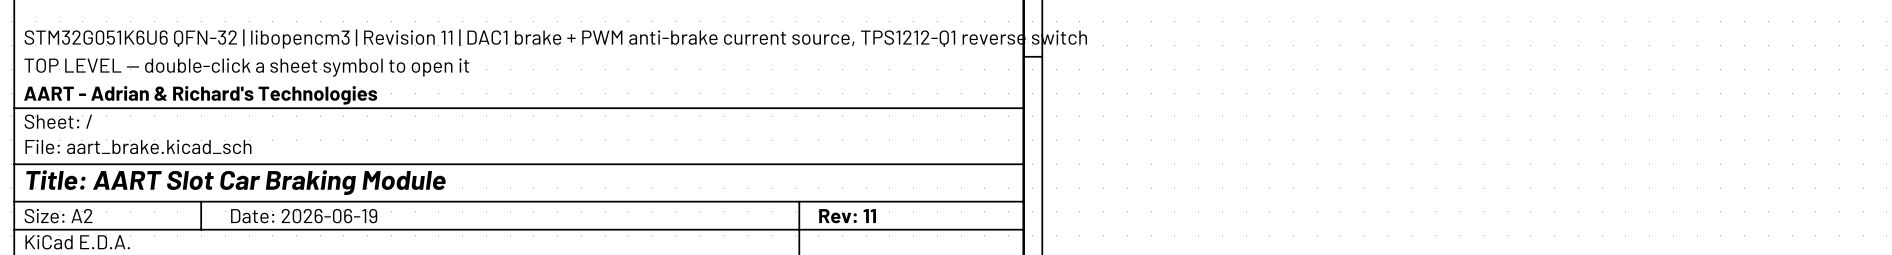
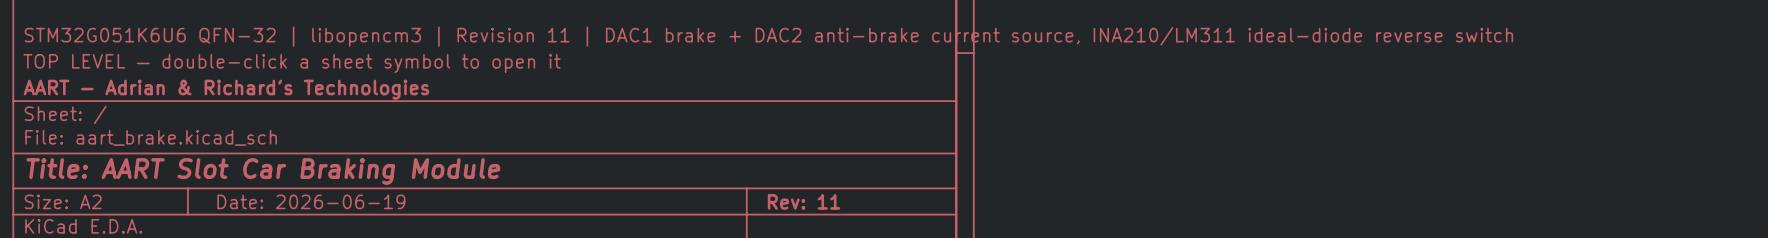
title block: STM32G051K6U6 QFN-32 | libopencm3 | Revision 11 | DAC1 brake + PWM anti-brake current source, TPS1212-Q1 reverse switch (555, 38) -> STM32G051K6U6 QFN-32 | libopencm3 | Revision 11 | DAC1 brake + DAC2 anti-brake current source, INA210/LM311 ideal-diode reverse switch (768, 36)

